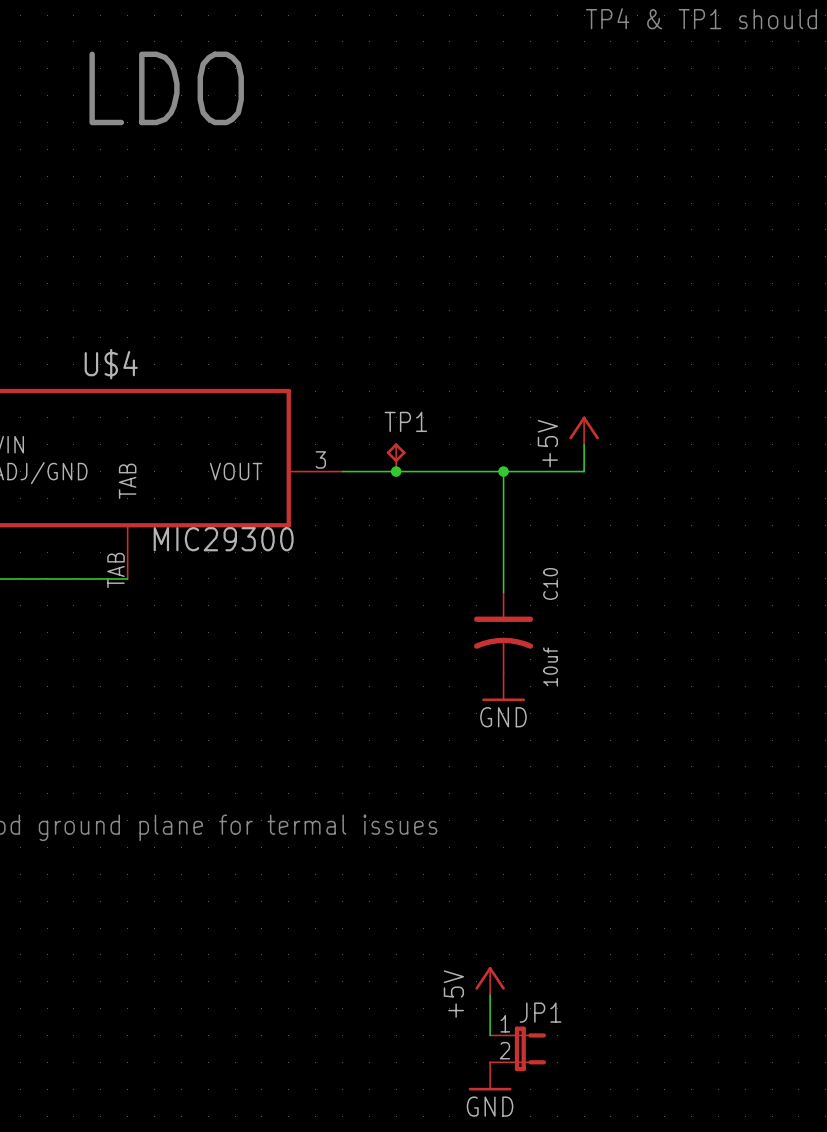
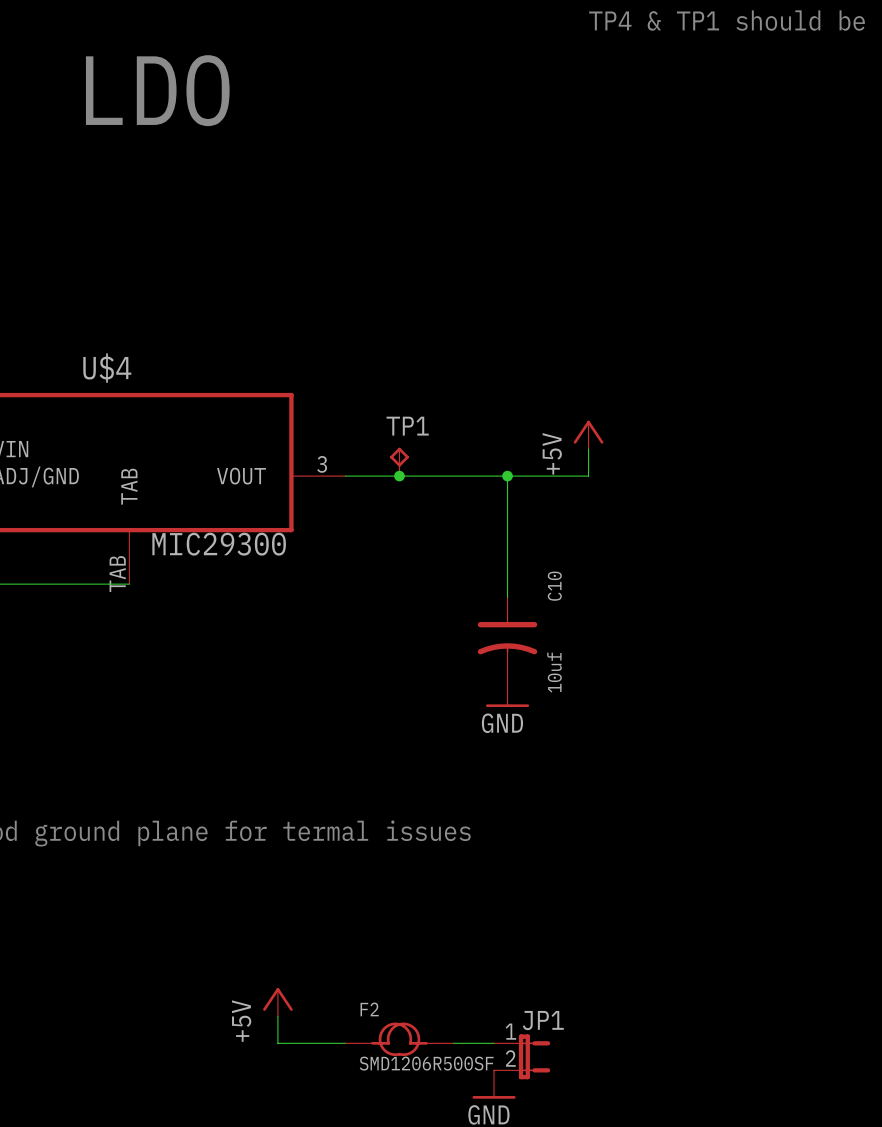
power symbol position: +5V (490, 981) -> +5V (277, 1002)
wire: (490, 995) (490, 1035) -> (453, 1043) (494, 1043)
wire: none -> (277, 1016) (277, 1043) (345, 1043)
F2: none -> SMD1206R500SF (399, 1039)

